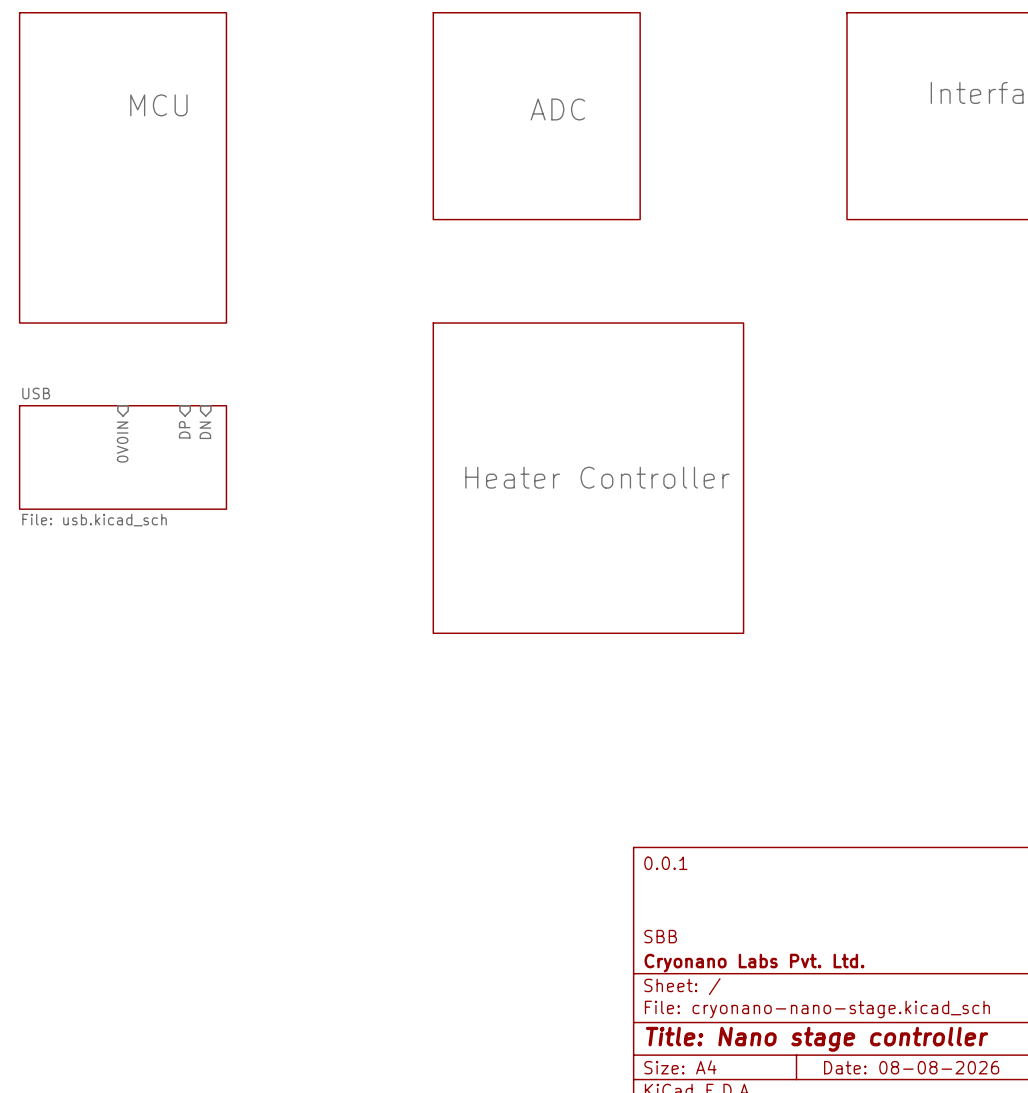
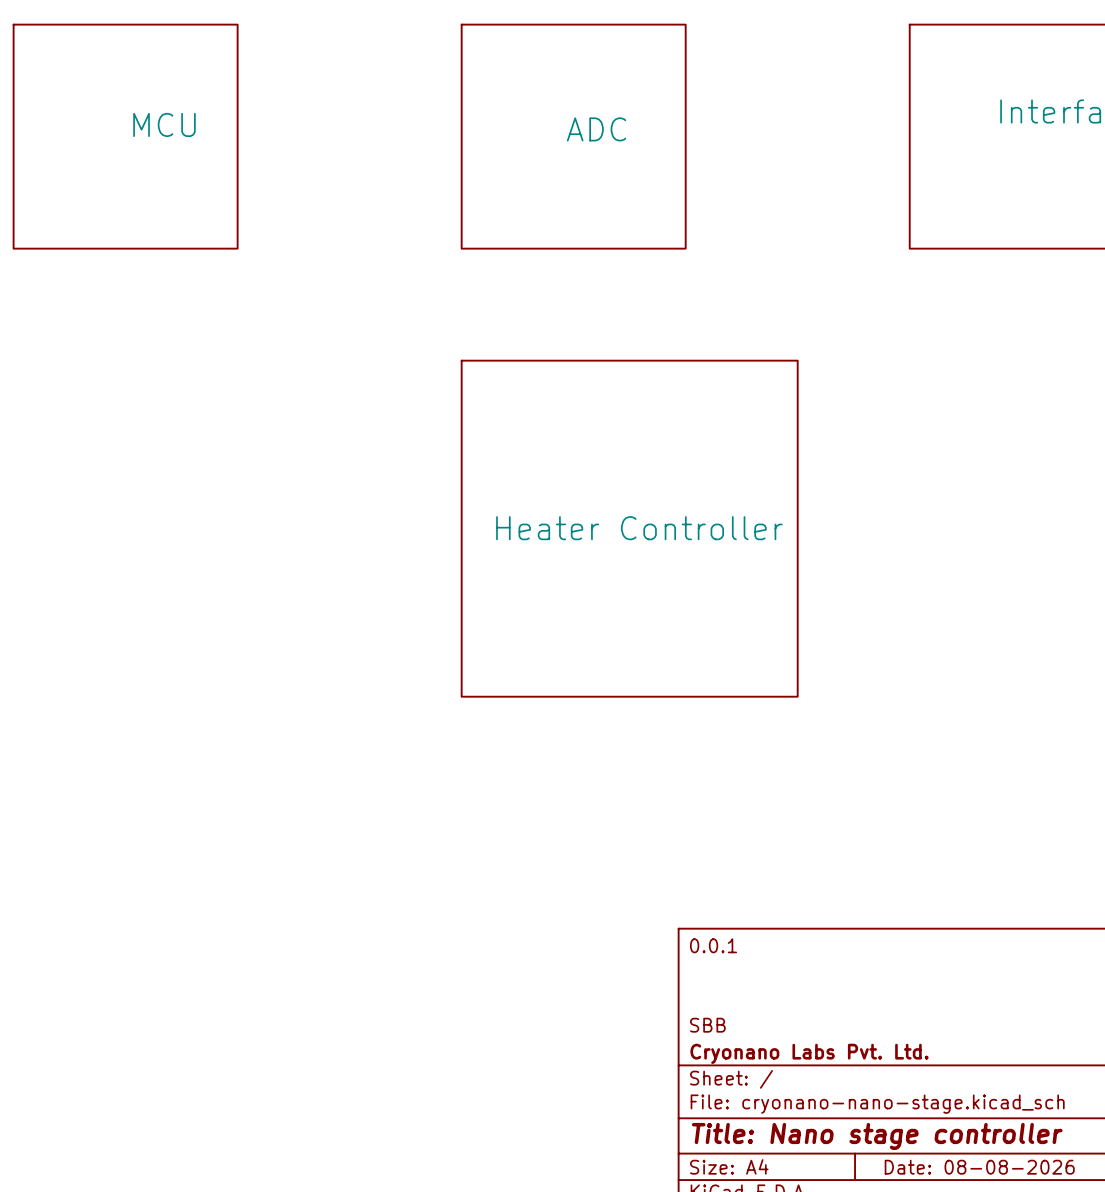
sheet MCU: none -> (125, 136)
sheet MCU: (123, 167) -> none
sheet pin: DP (184, 429) -> none
sheet pin: DN (205, 430) -> none
sheet pin: 0V0IN (122, 442) -> none
sheet USB: File: usb.kicad_sch (123, 457) -> none

